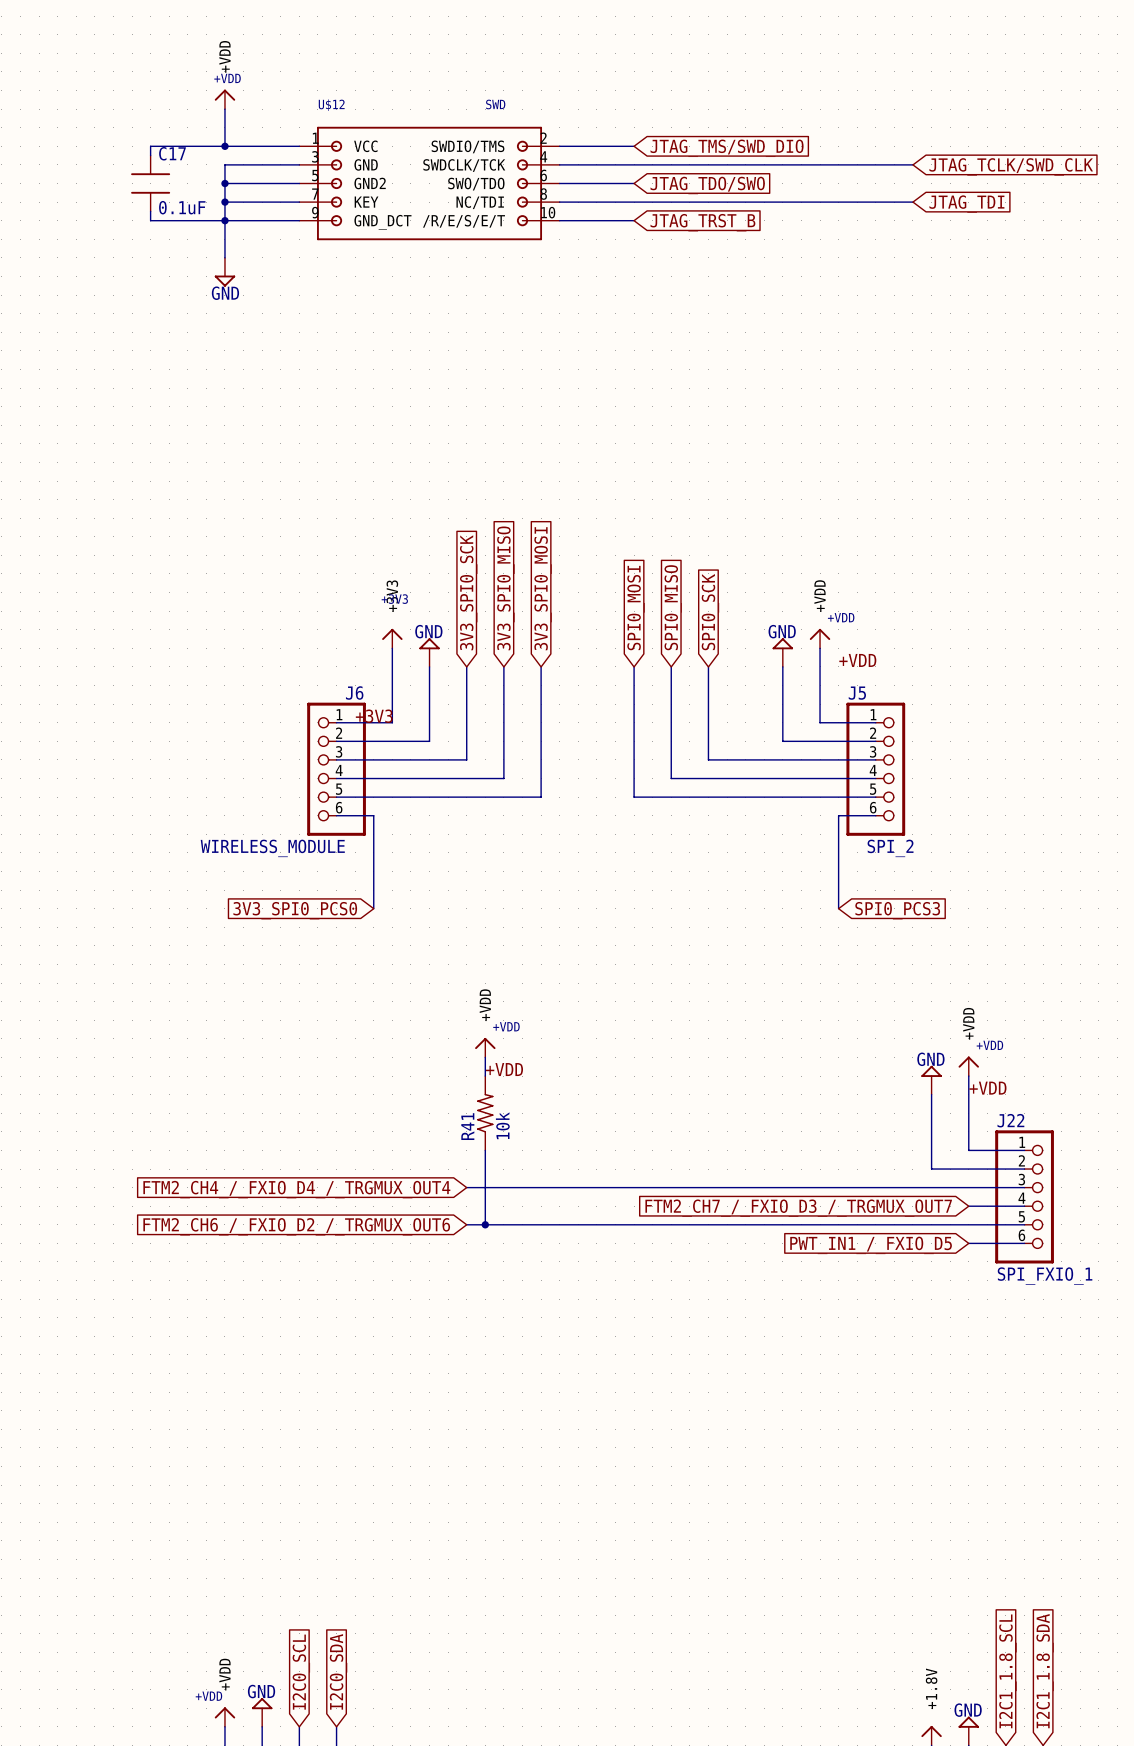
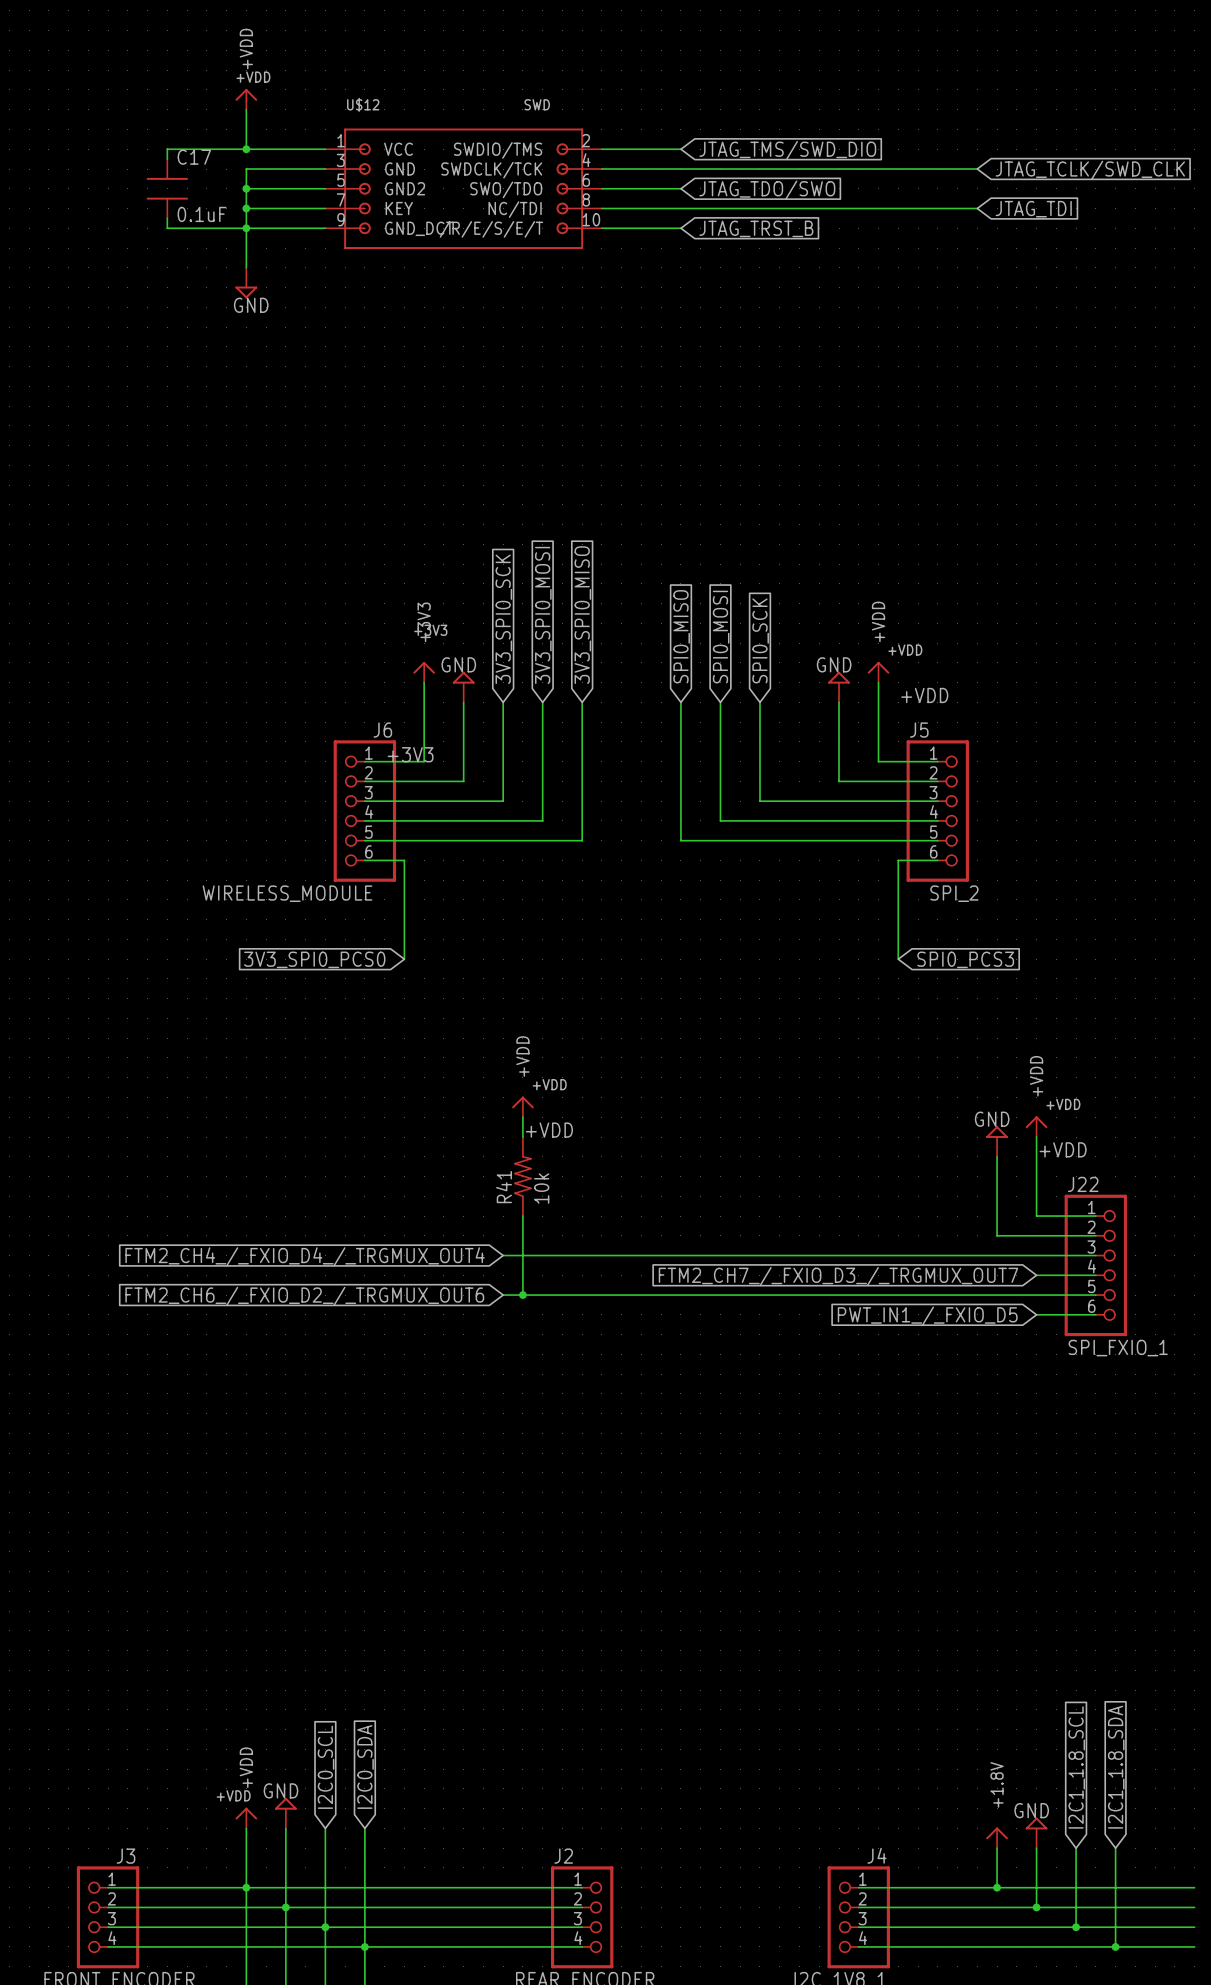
global label: 3V3_SPI0_MISO (505, 588) -> 3V3_SPI0_MOSI (543, 615)
global label: 3V3_SPI0_MOSI (543, 588) -> 3V3_SPI0_MISO (582, 615)
global label: SPI0_MISO (673, 607) -> SPI0_MOSI (721, 637)
global label: SPI0_MOSI (636, 608) -> SPI0_MISO (681, 636)

